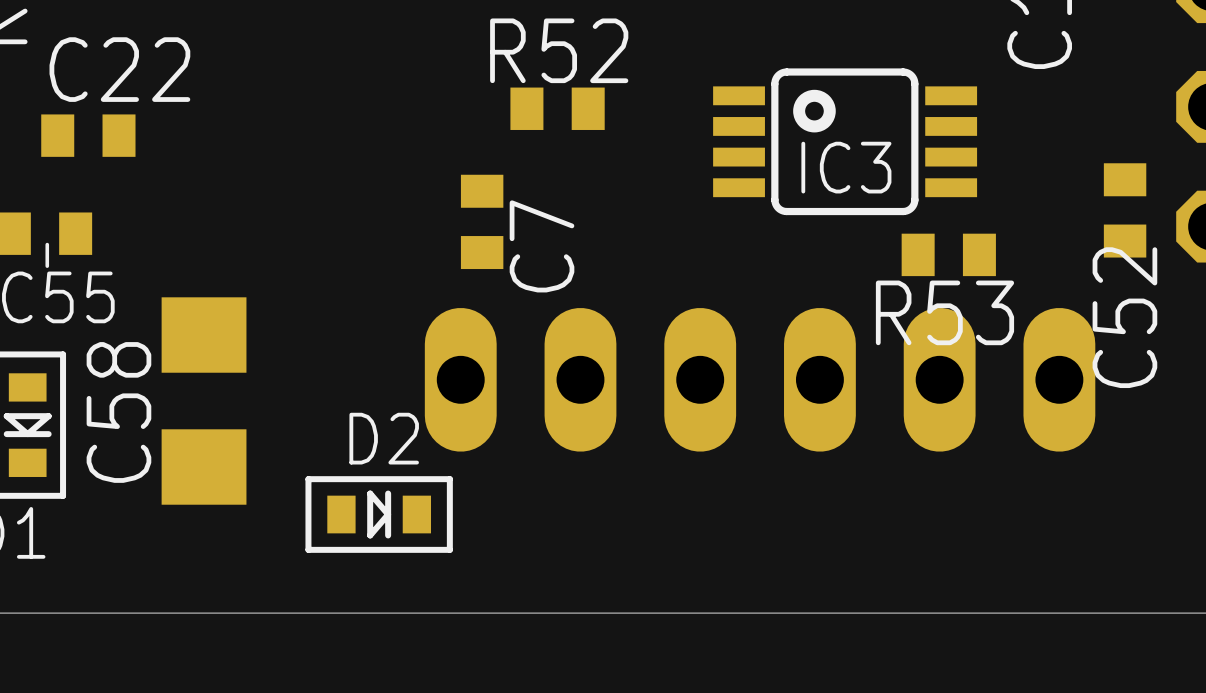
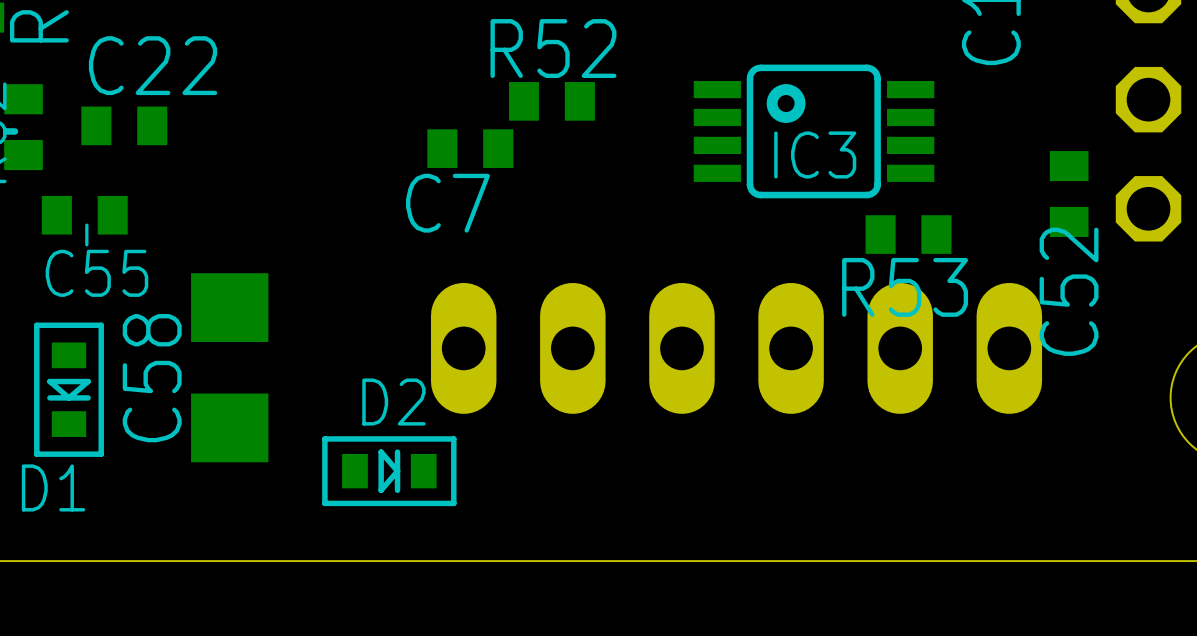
C7 rotation: 0° (482, 221) -> 90° clockwise (470, 148)
C7 position: (482, 221) -> (470, 148)

